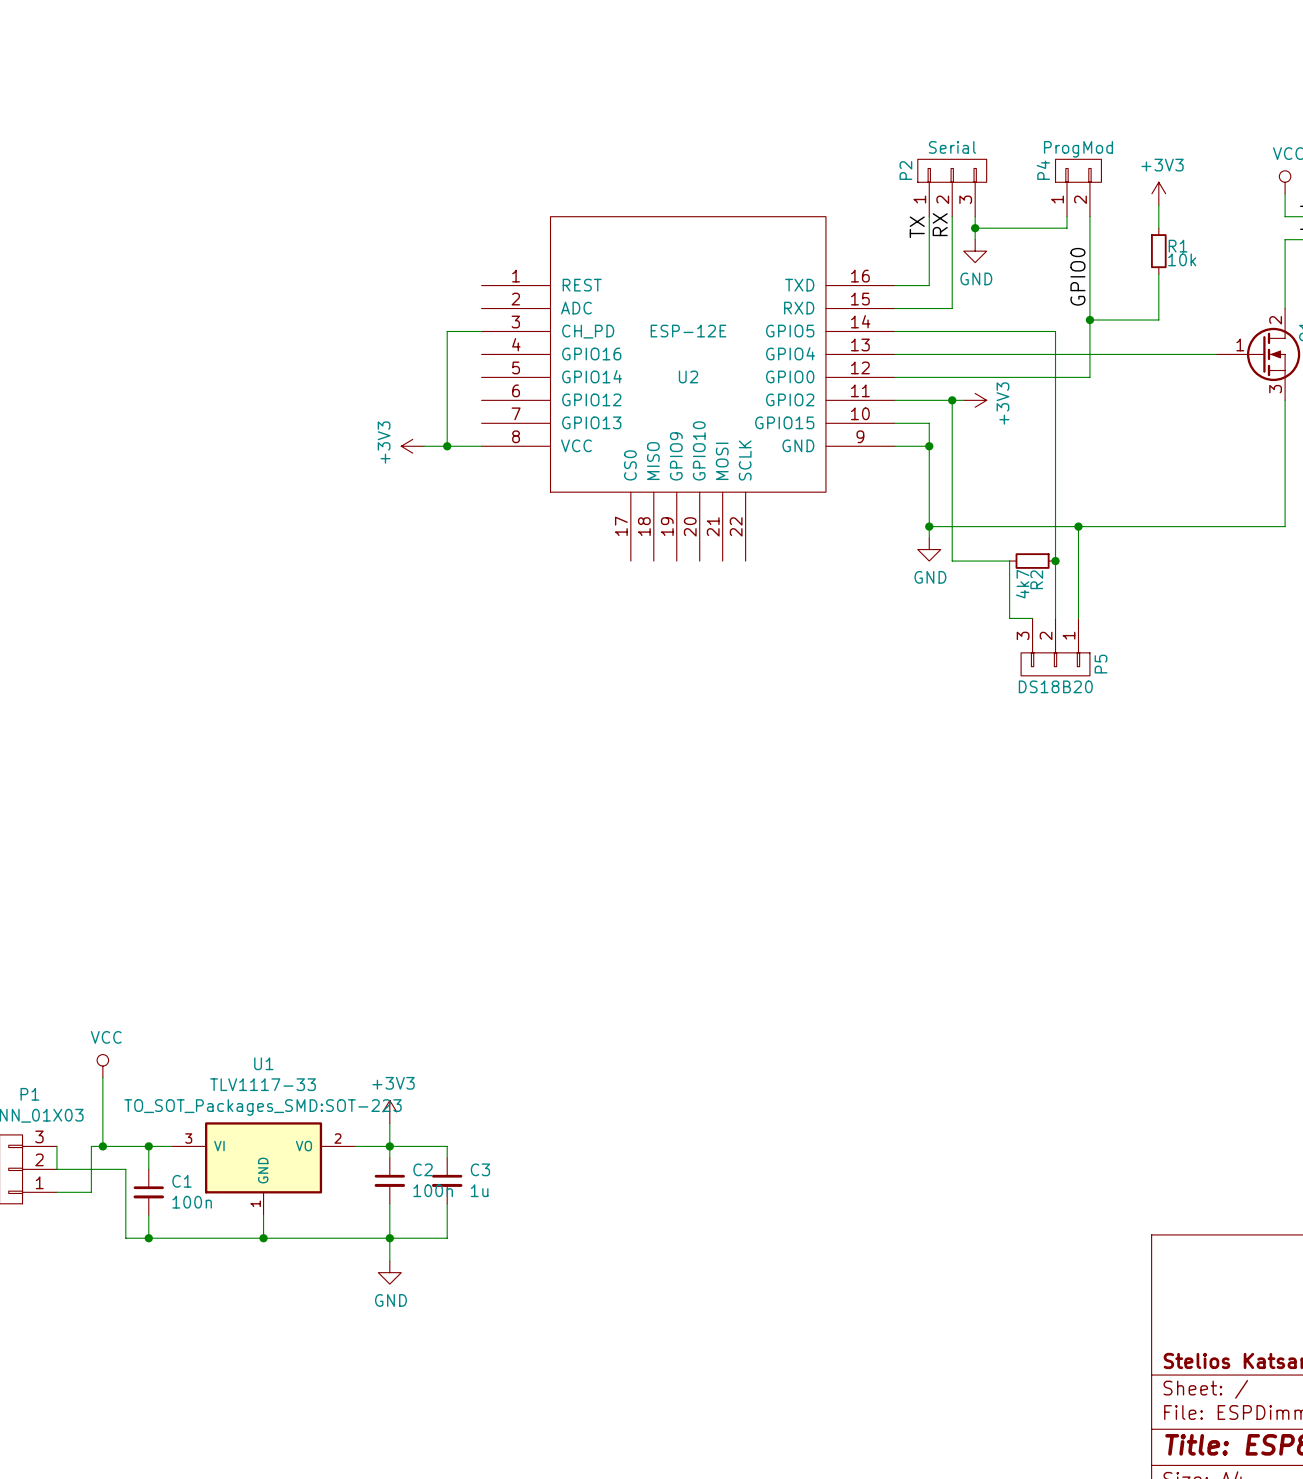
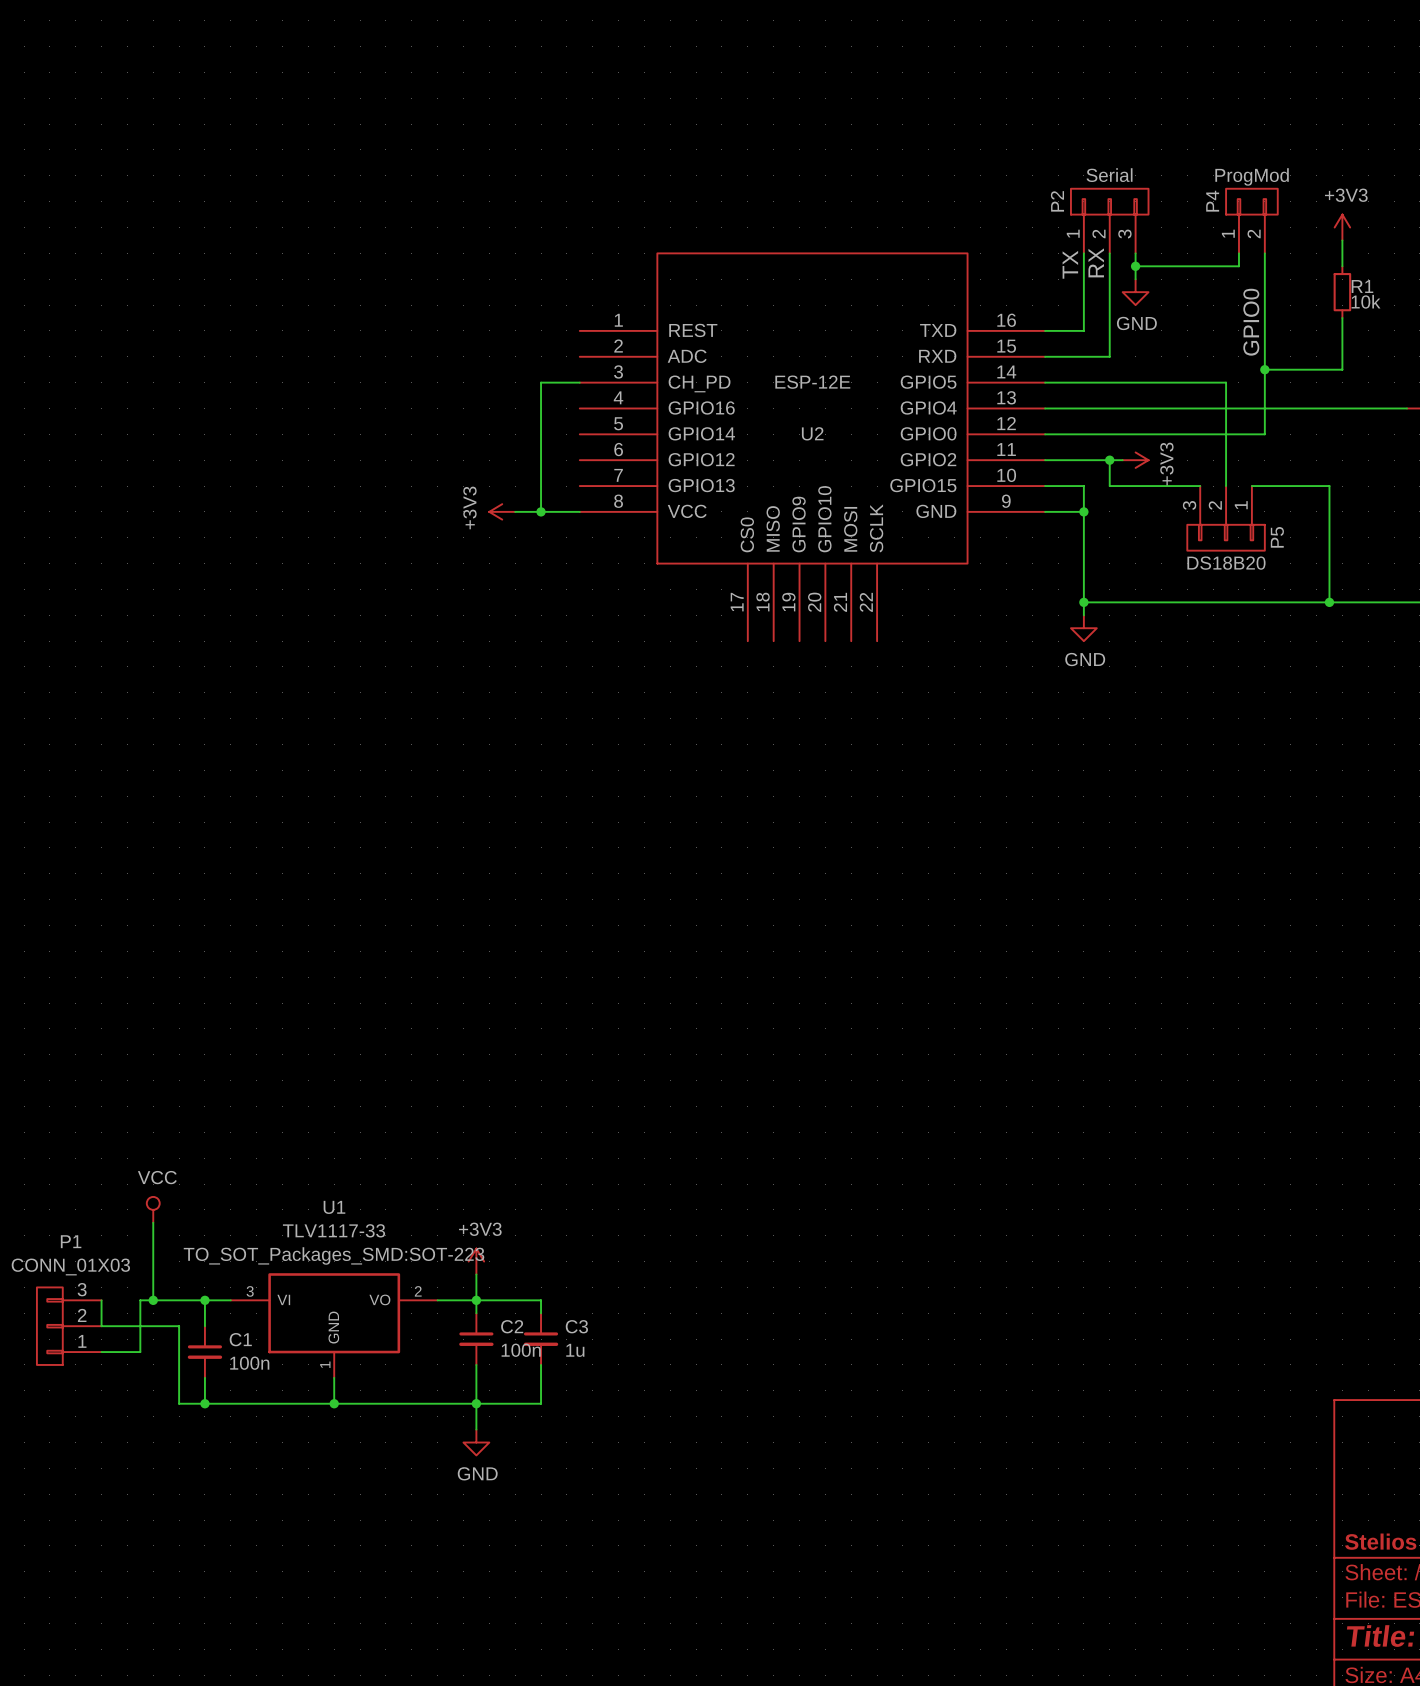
wire: (952, 423) (952, 561) (1009, 561) (1009, 618) (1032, 618) -> (1109, 486) (1200, 486)
wire: (1055, 423) (1055, 618) -> none
wire: none -> (1251, 486) (1329, 486) (1329, 602)
wire: (1078, 526) (1078, 618) -> none
junction: (1078, 526) -> none
junction: none -> (1329, 602)
R2: 4k7 (1032, 561) -> none
junction: (1055, 561) -> none
P5 position: (1055, 647) -> (1226, 518)

